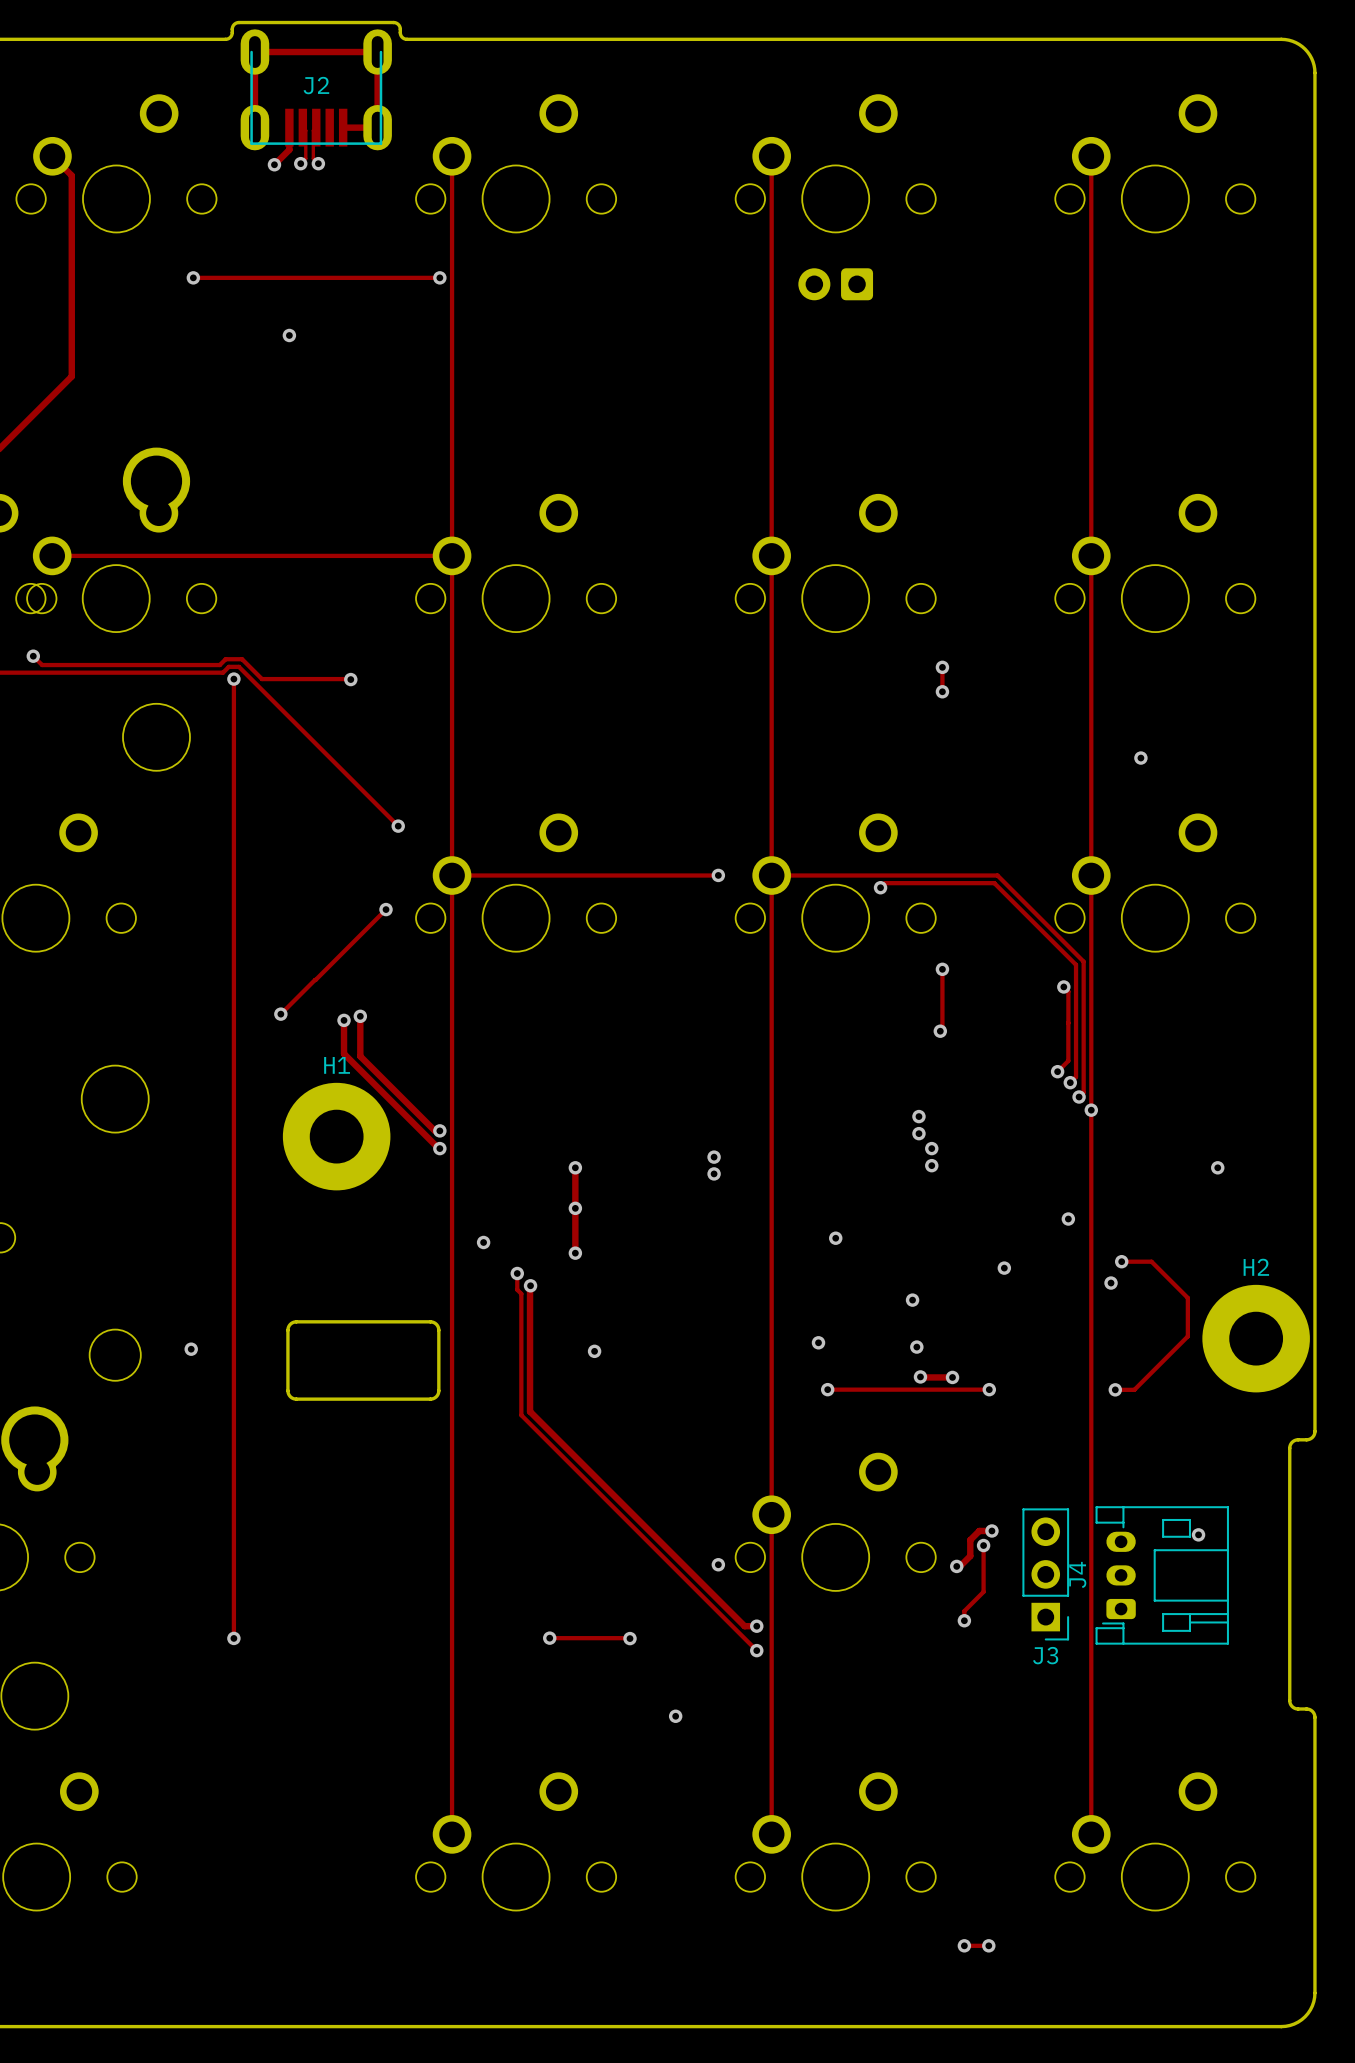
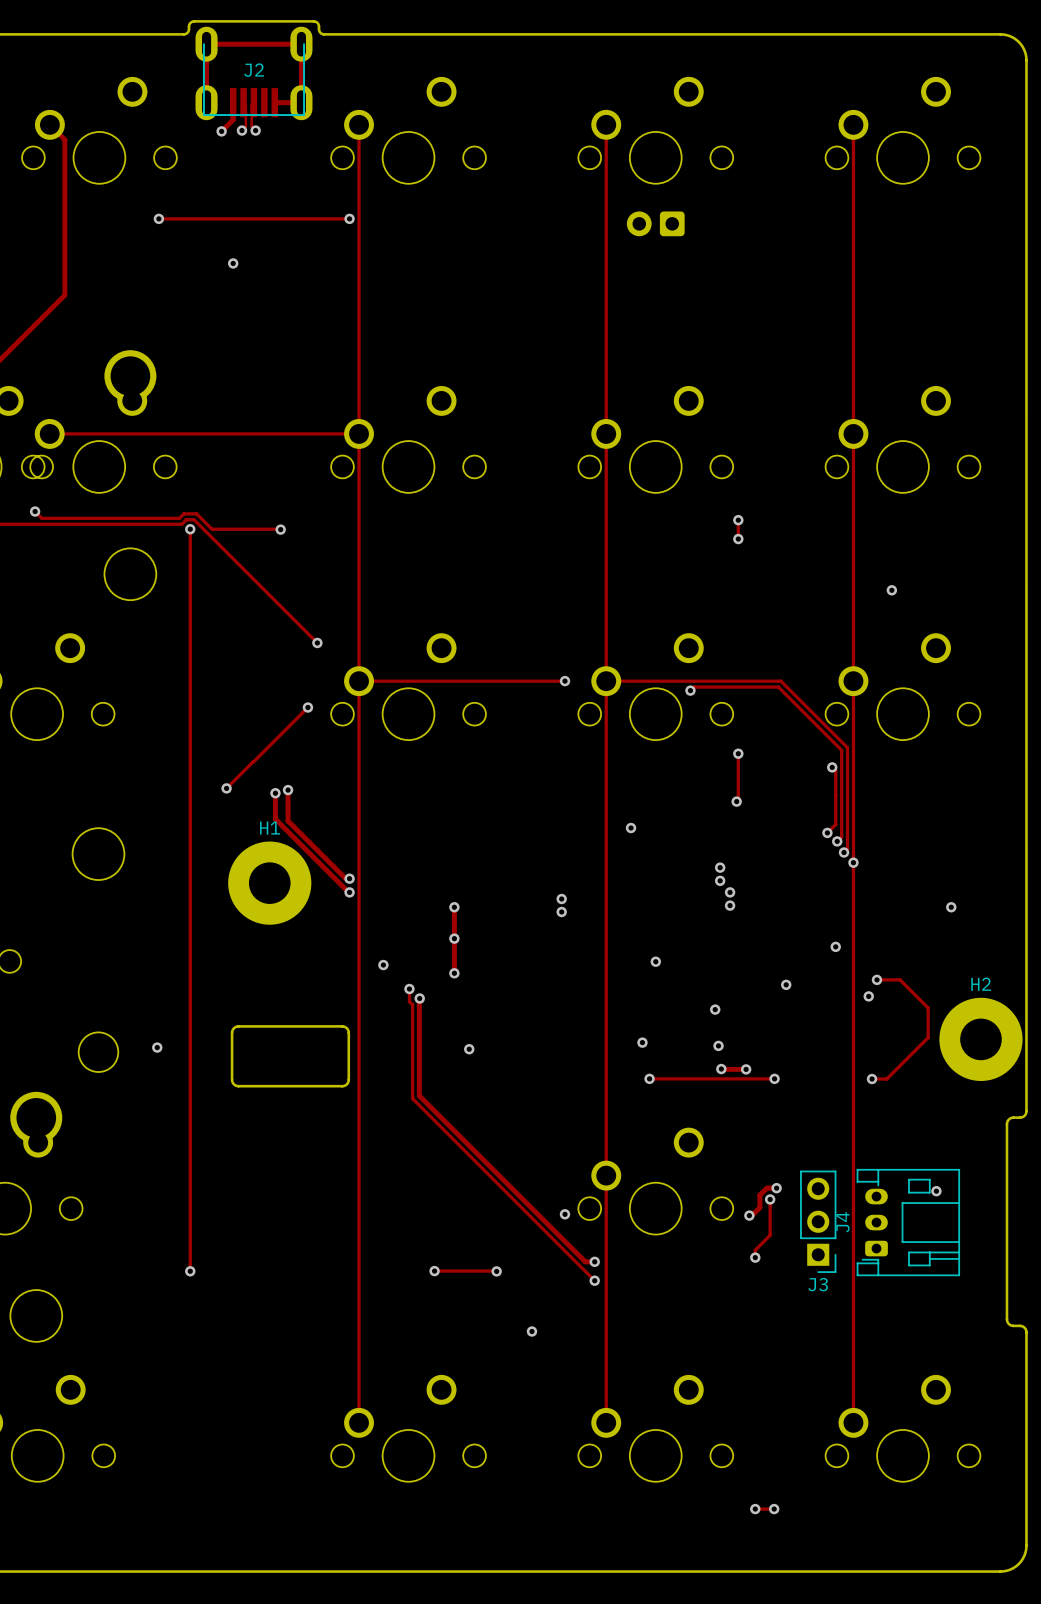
via: none -> (631, 828)

